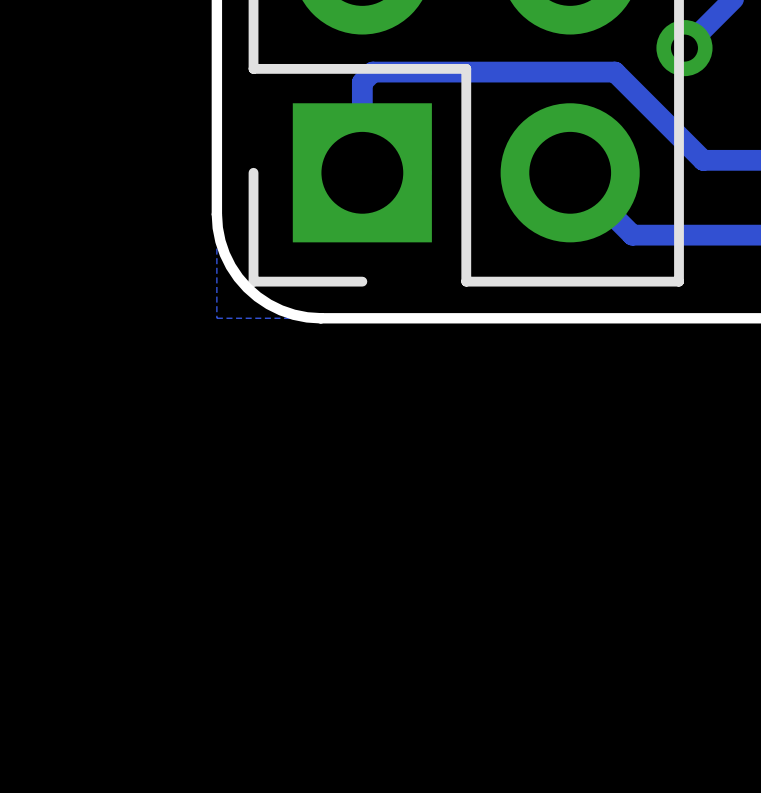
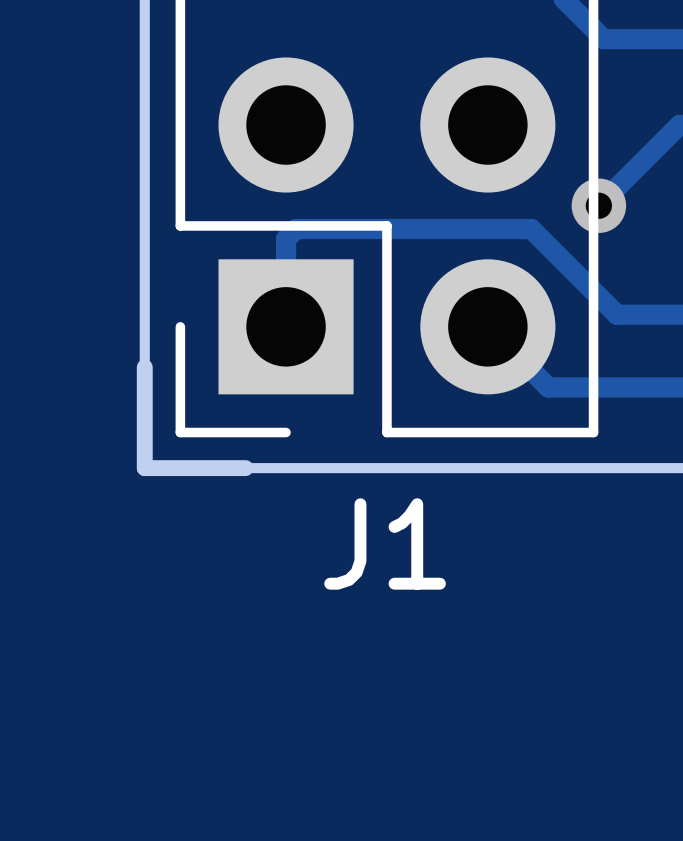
board edge: (216, 214) (220, 241) (224, 254) (230, 266) (247, 287) (268, 304) (281, 310) (293, 314) (320, 318) -> (144, 367) (144, 468) (245, 468)
J1 name: none -> J1 (385, 543)

